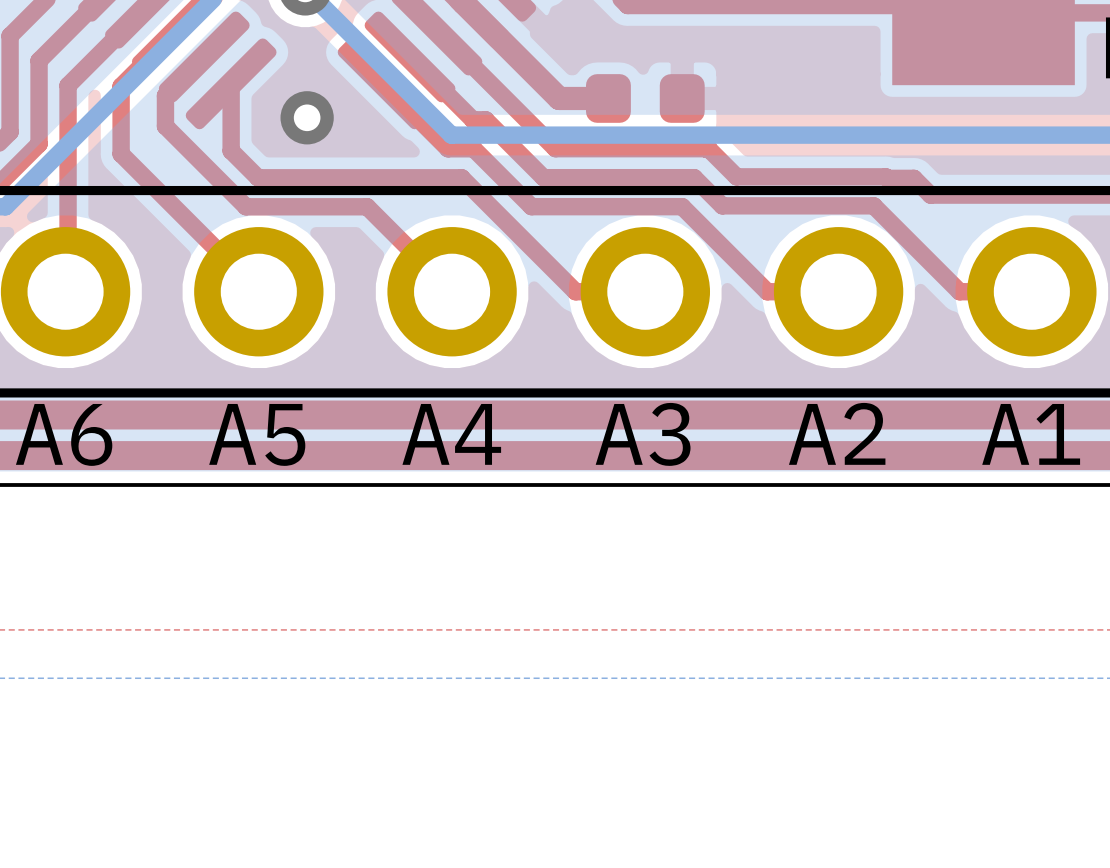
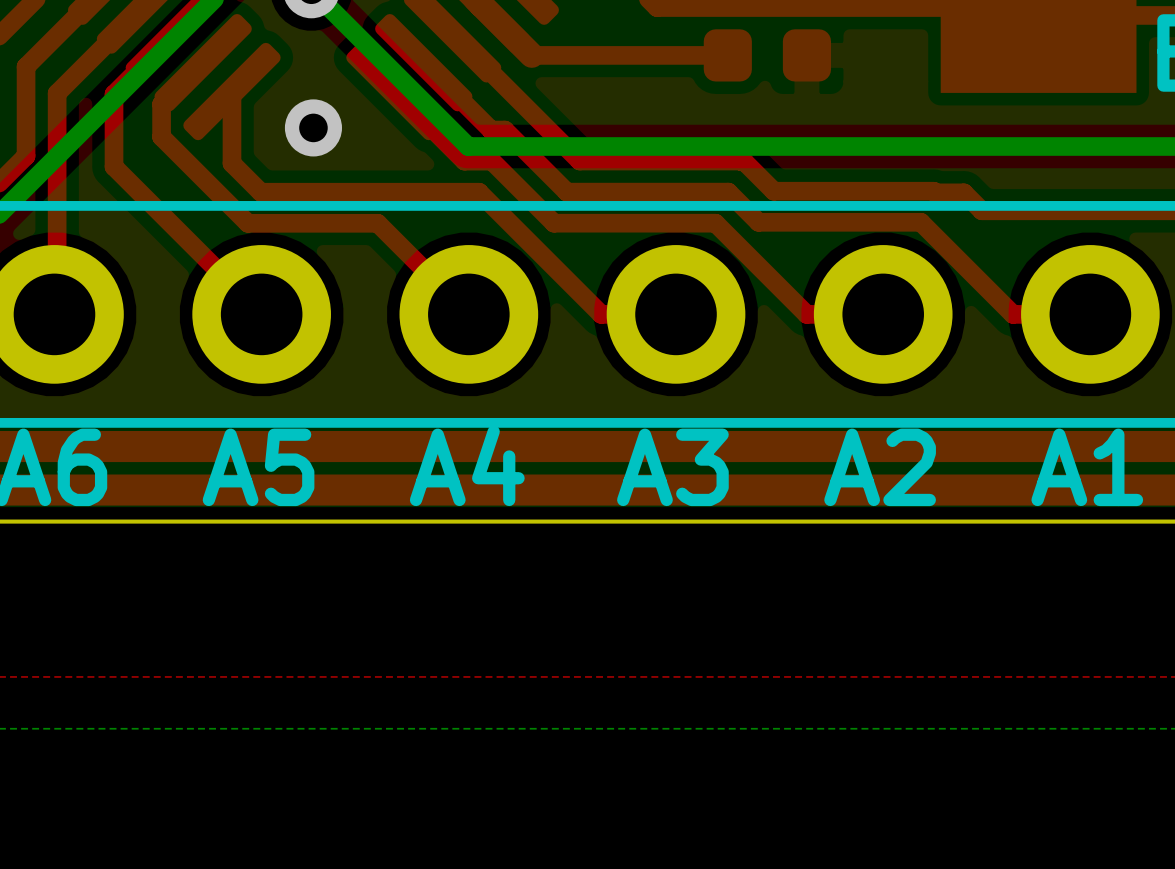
top track: (510, 50) (559, 98) (608, 98) -> (531, 55) (727, 55)
part position: (645, 98) -> (767, 55)

